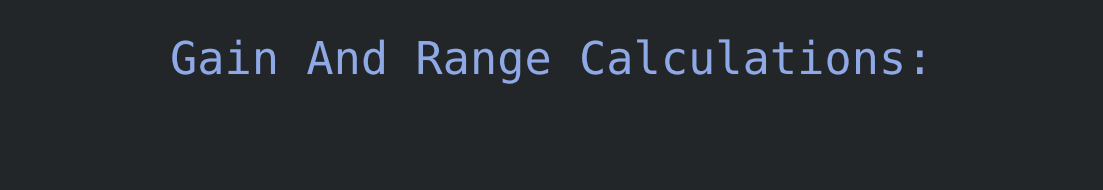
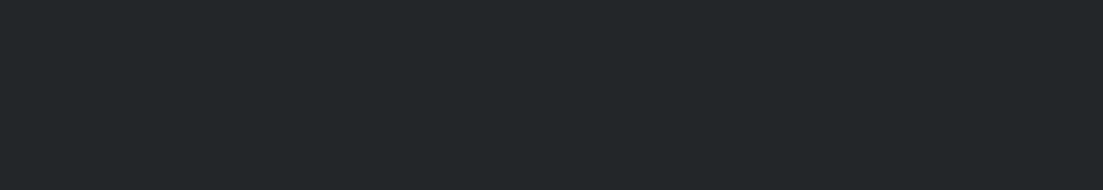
text: Gain And Range Calculations: (547, 61) -> none

